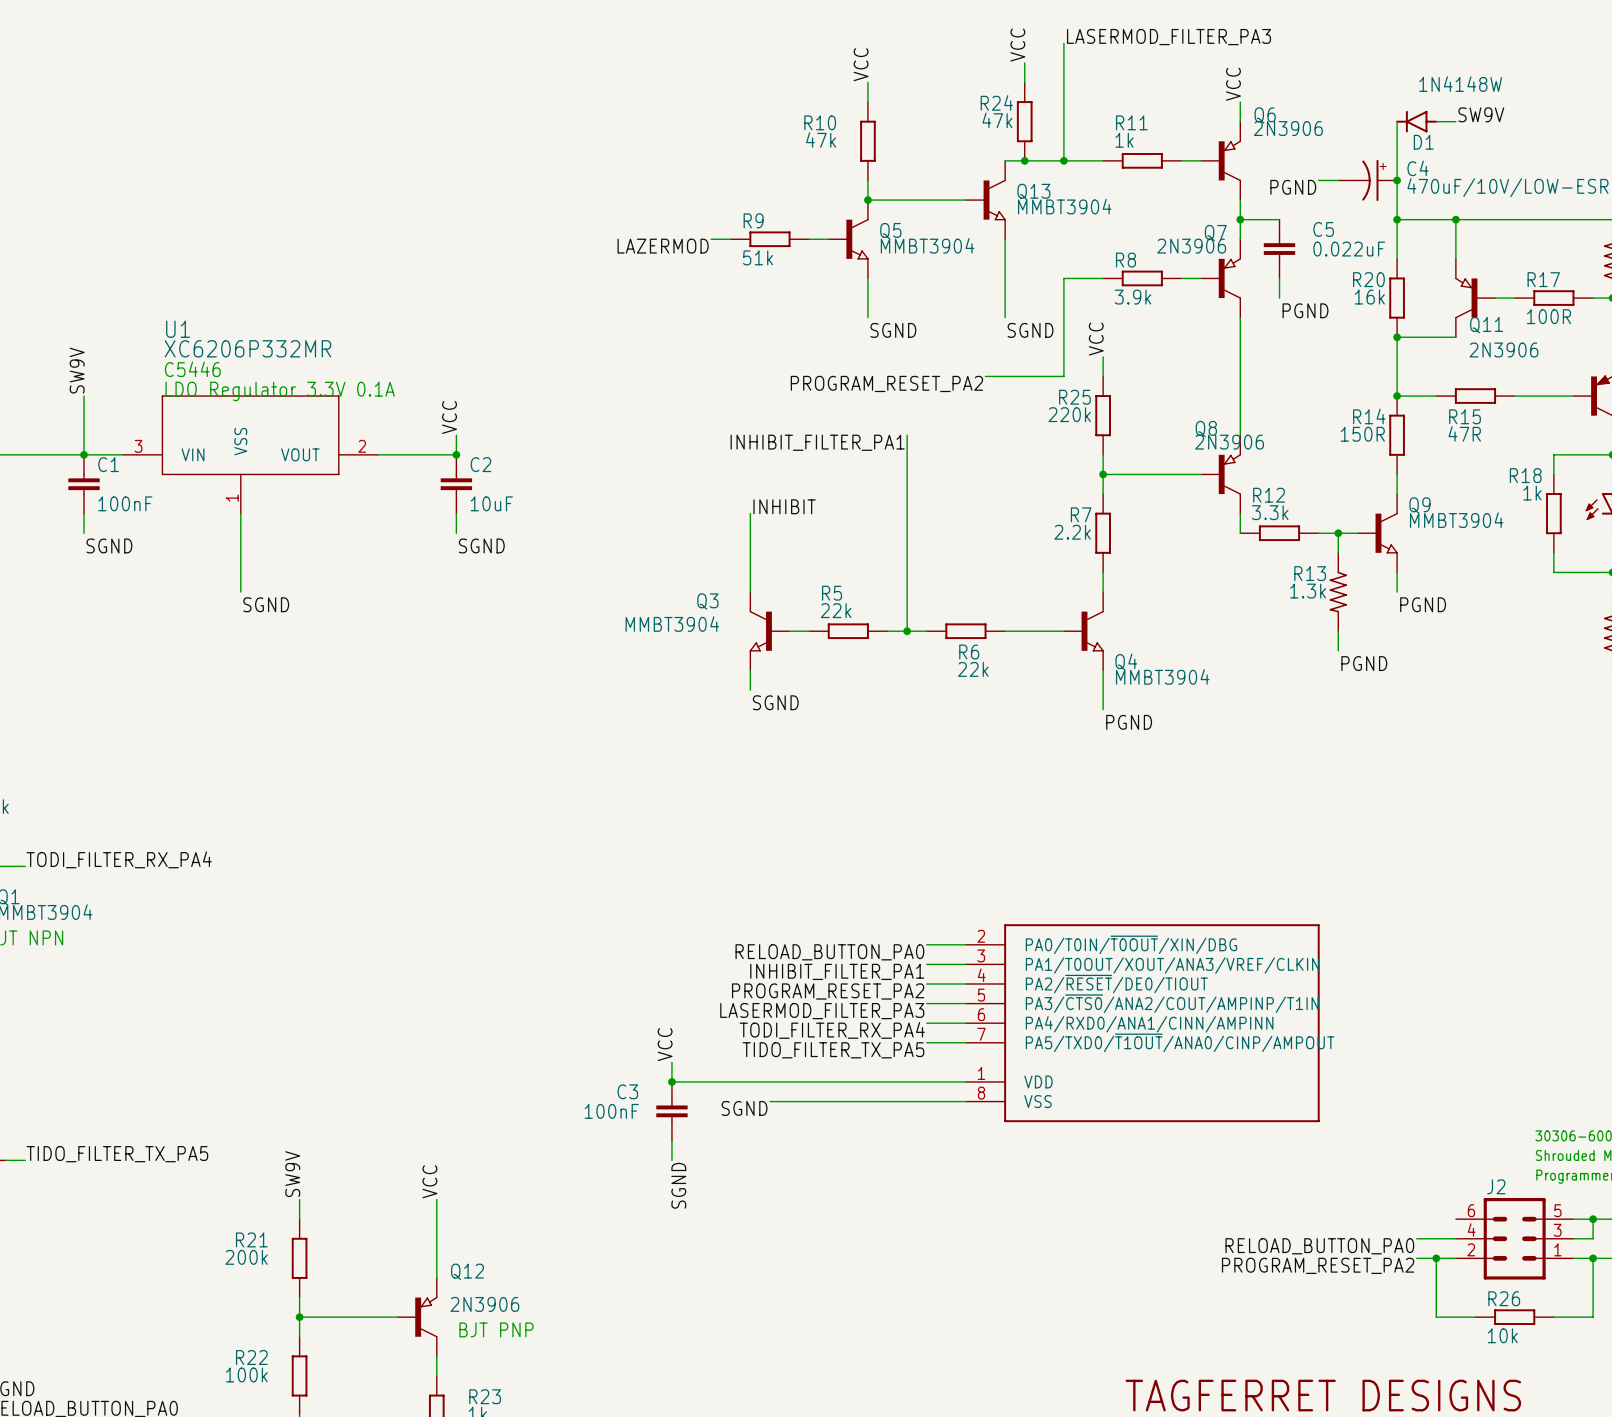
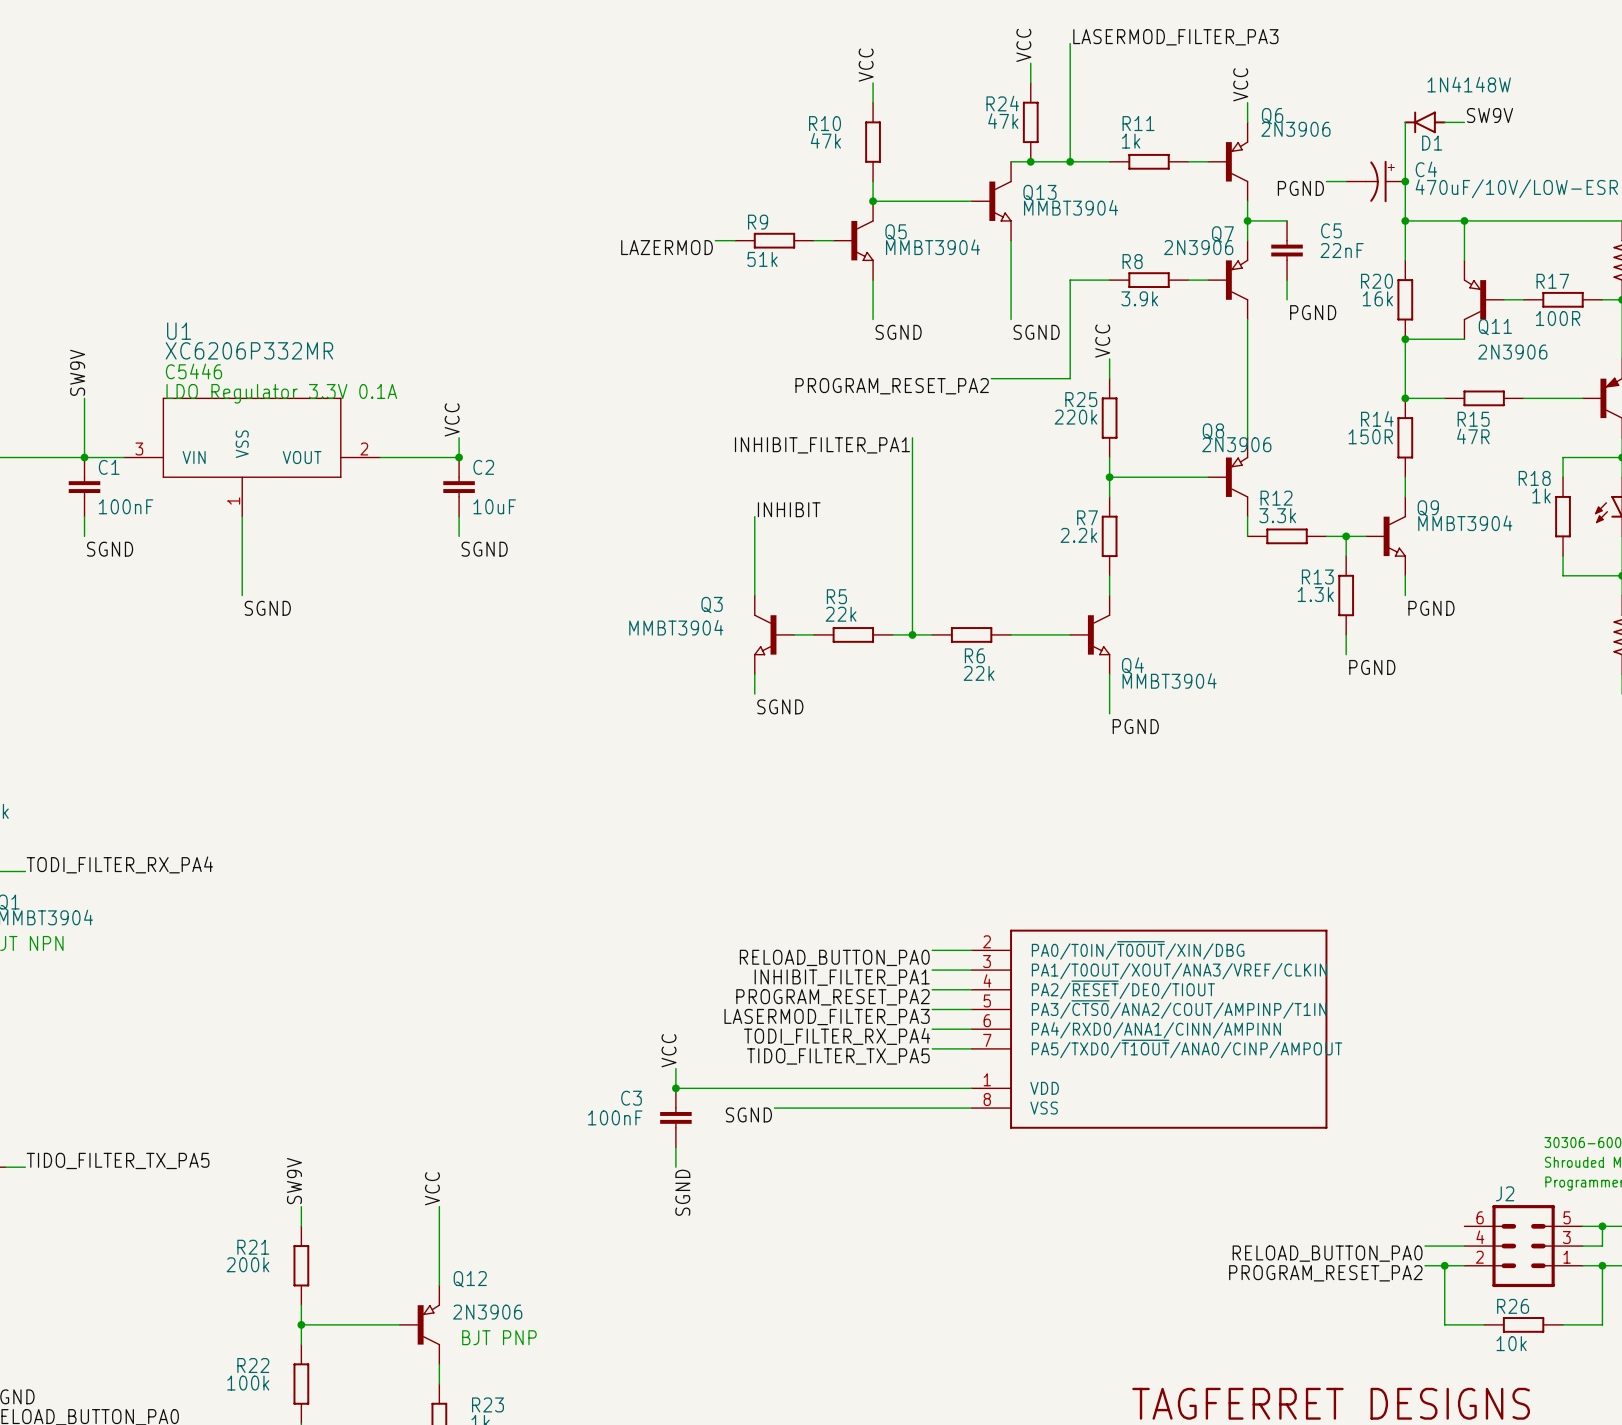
C5 value: 0.022uF (1349, 249) -> 22nF (1342, 250)
R13 symbol: [1329, 552, 1347, 632] -> [1338, 556, 1355, 635]

